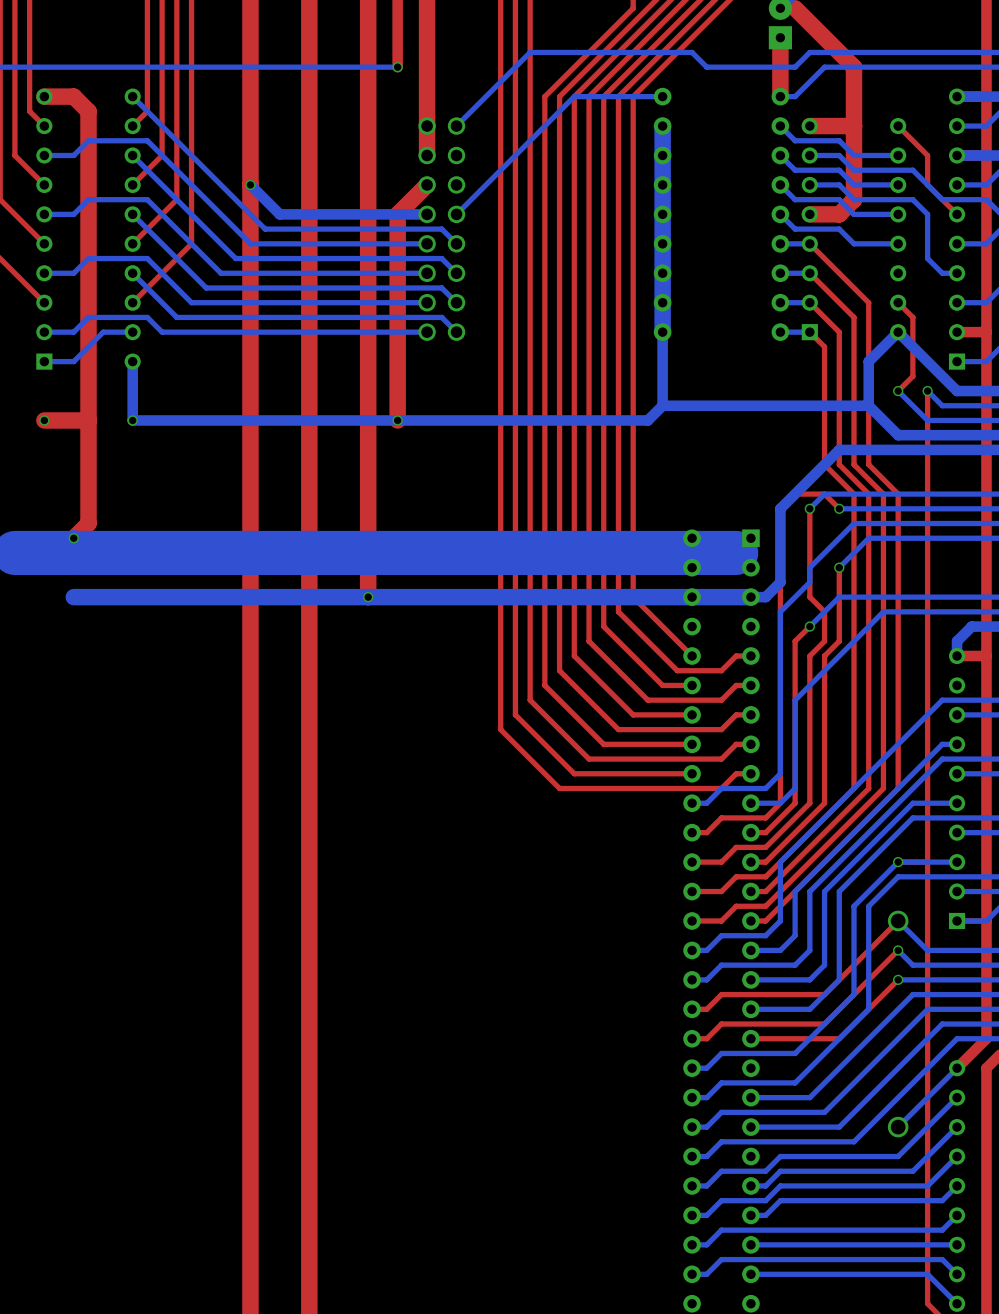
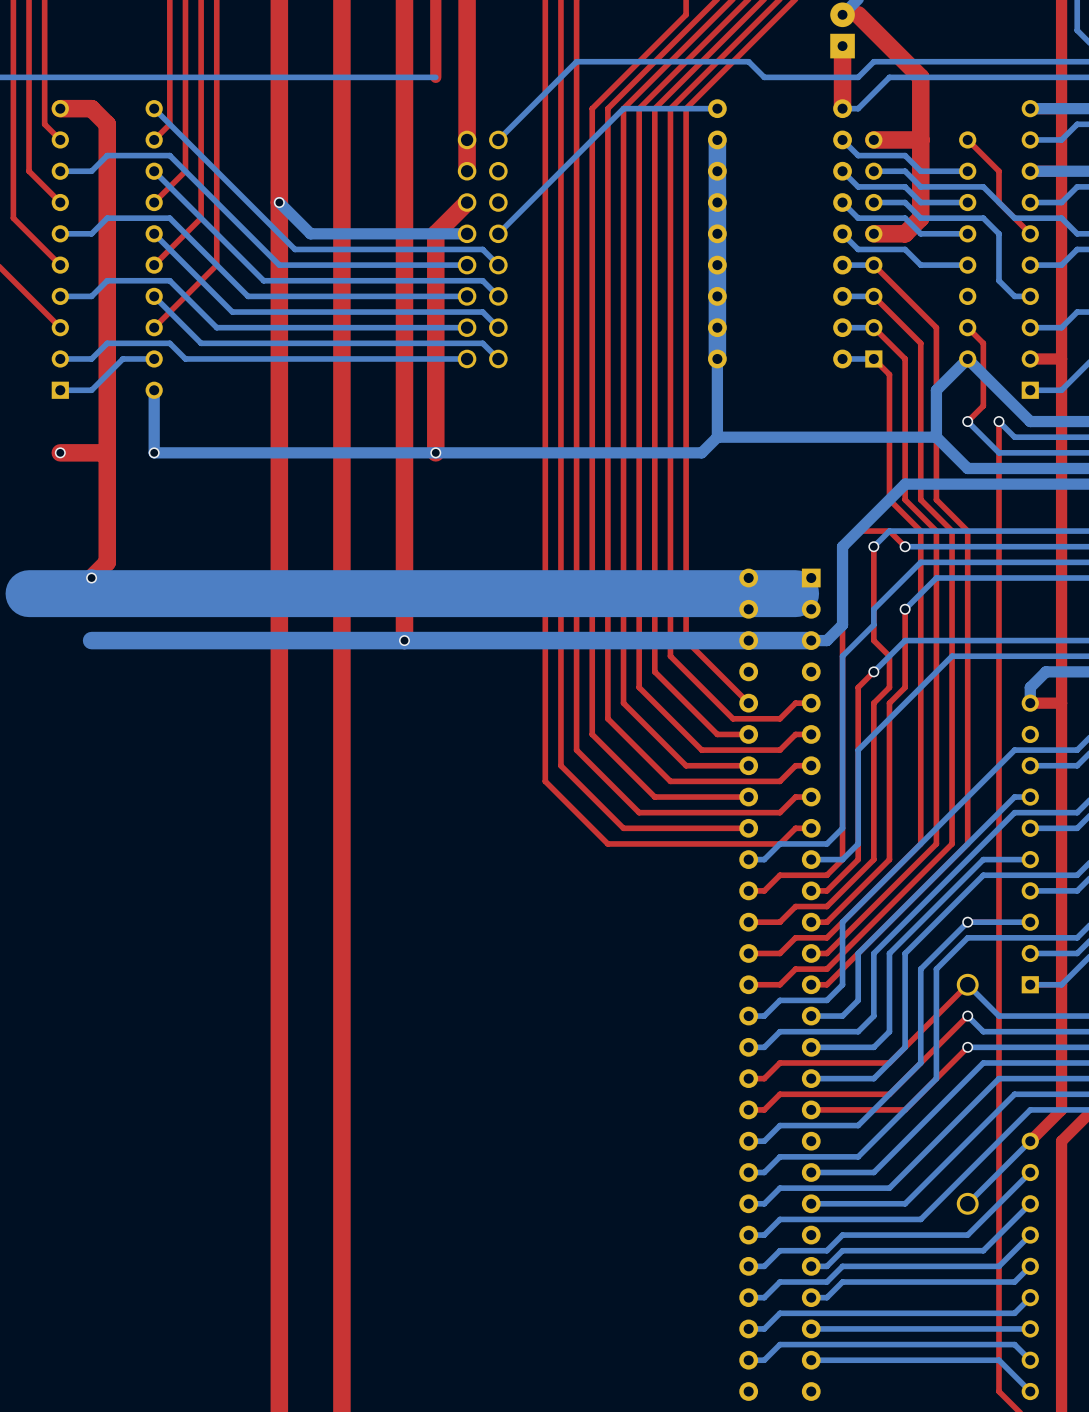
via: (397, 67) -> none

